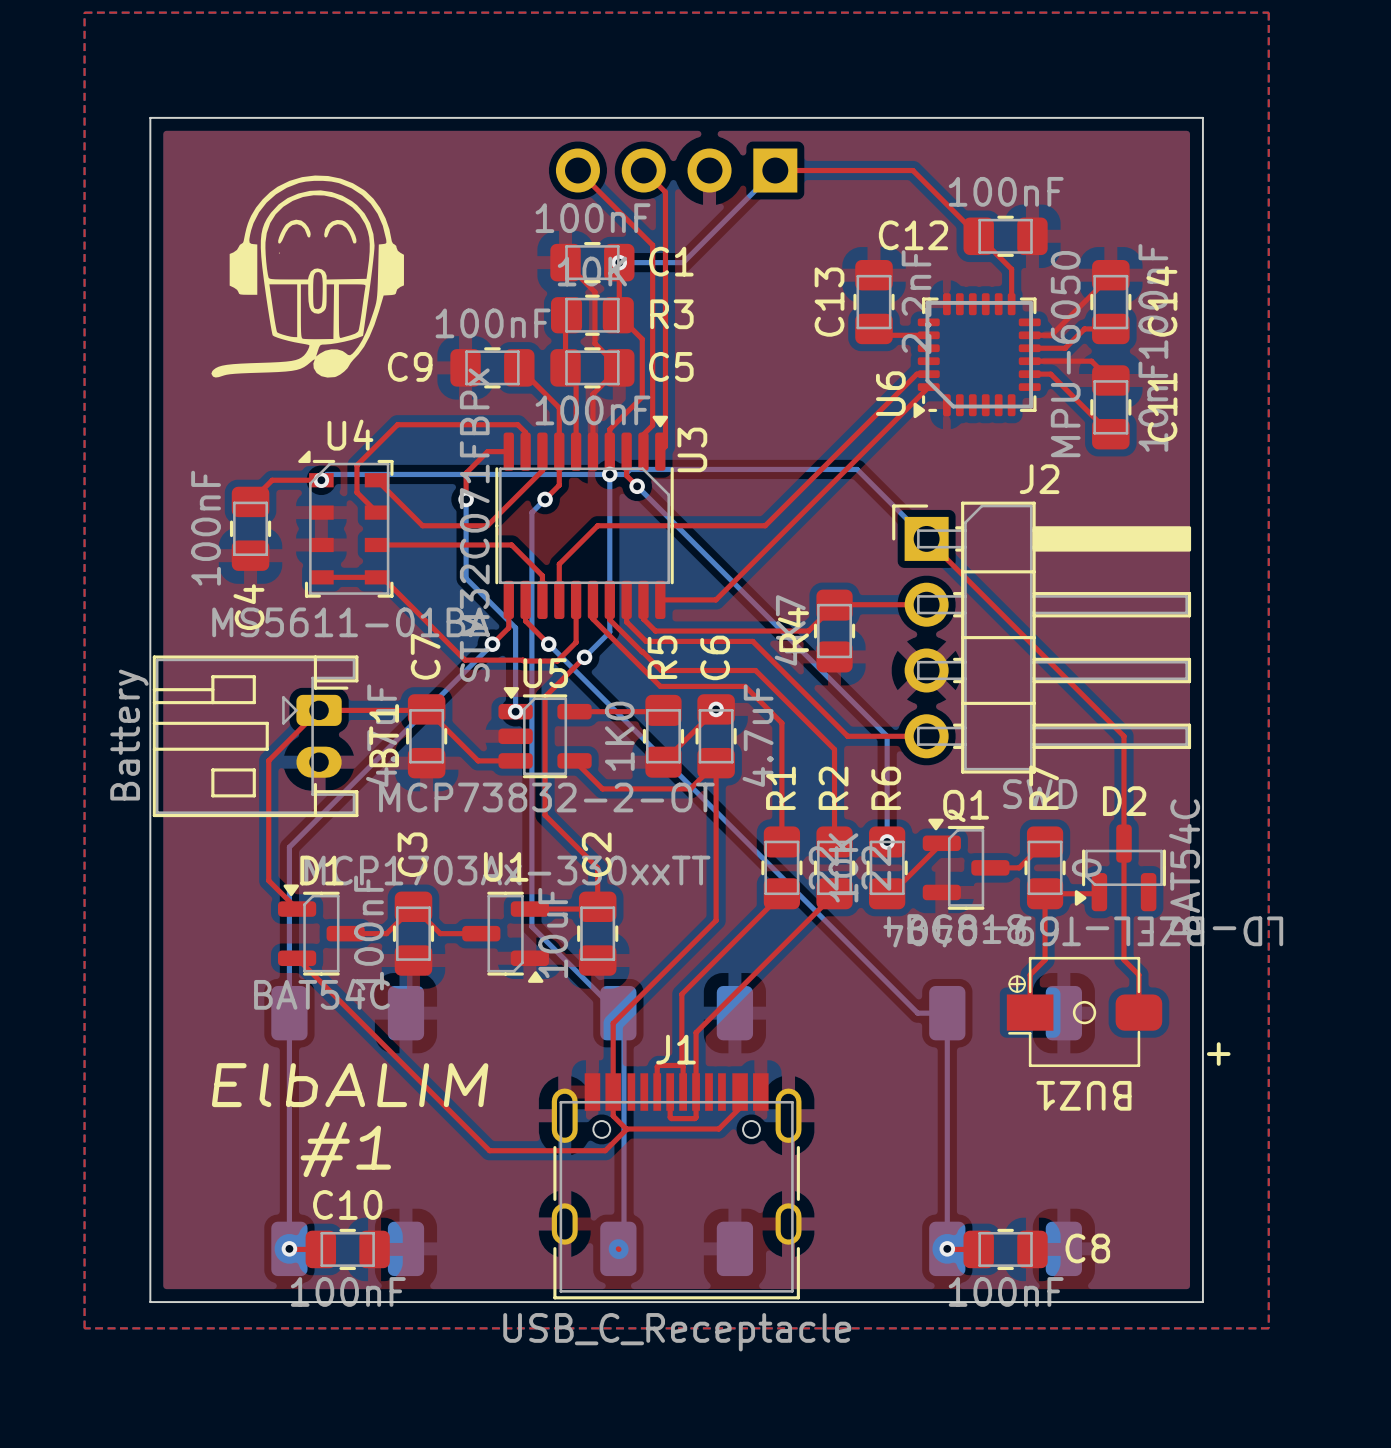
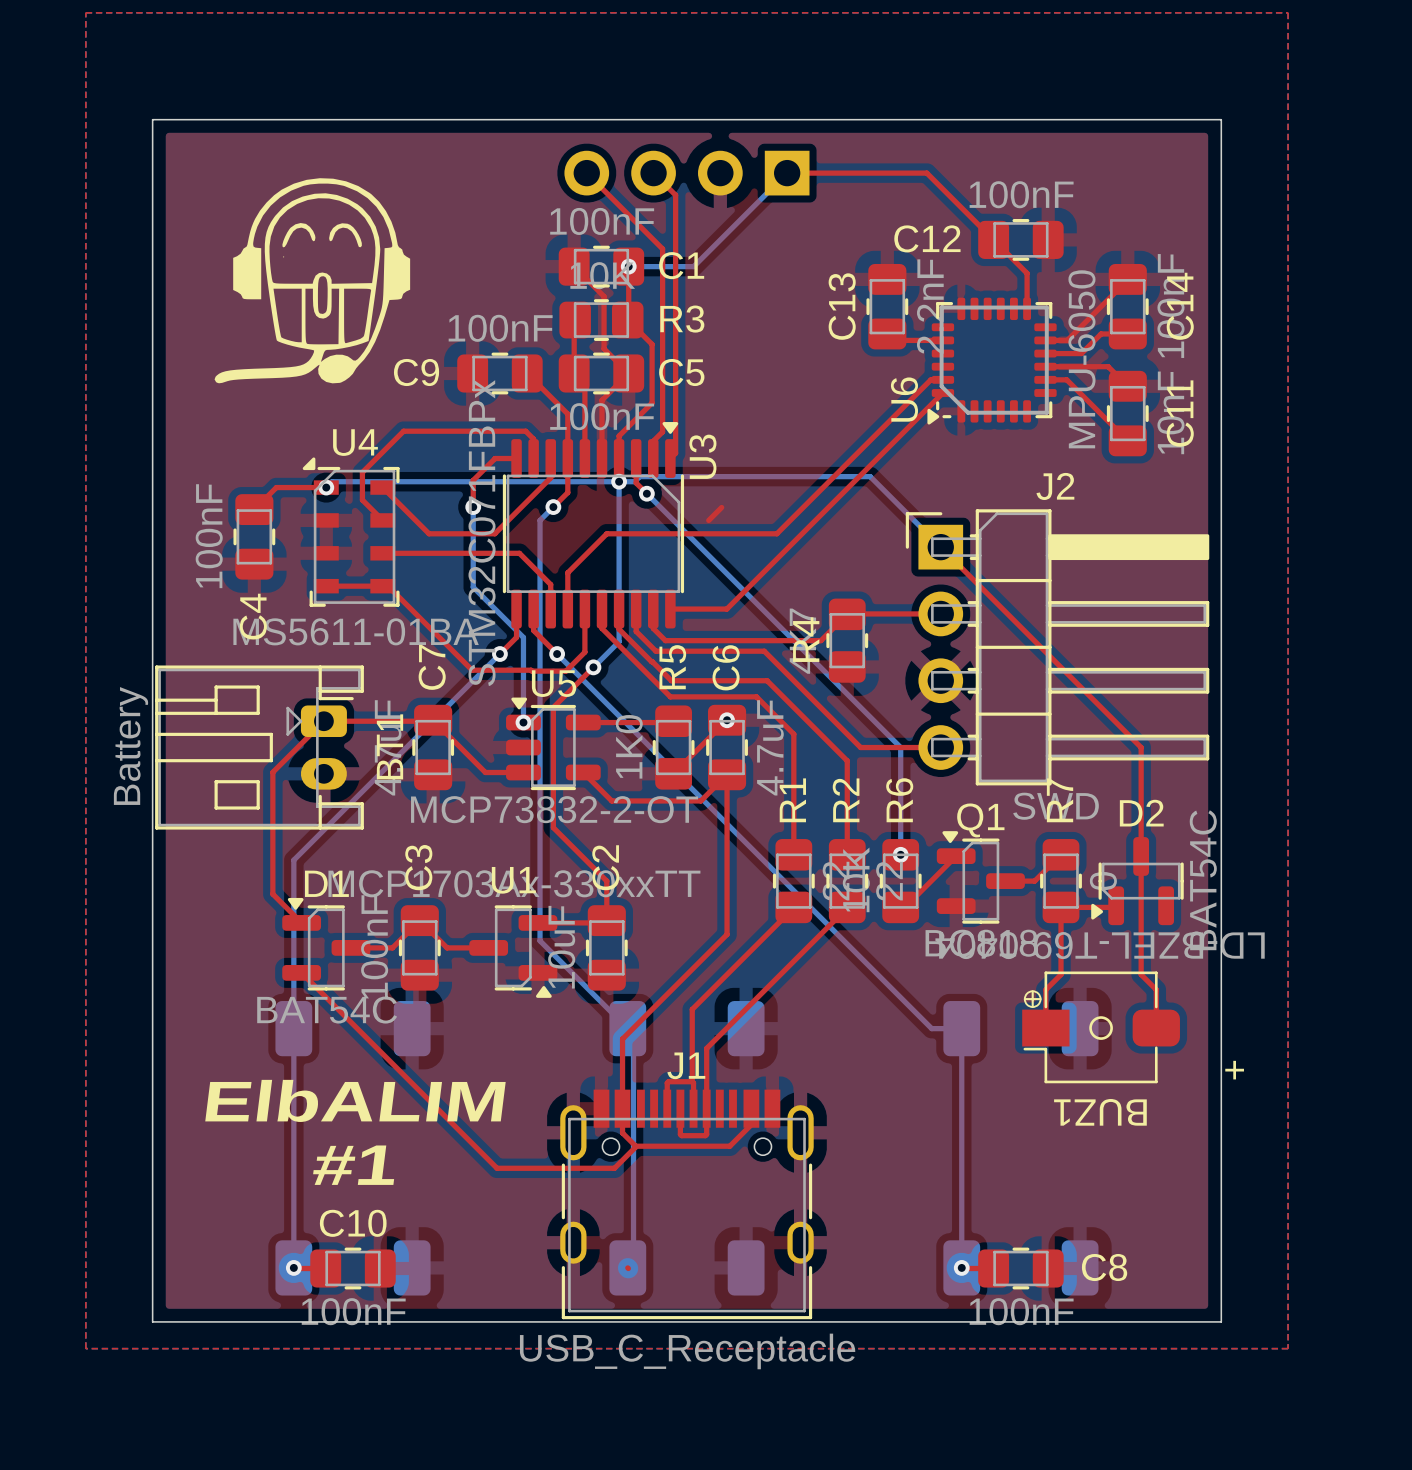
top track: none -> (721, 507) (708, 520)

